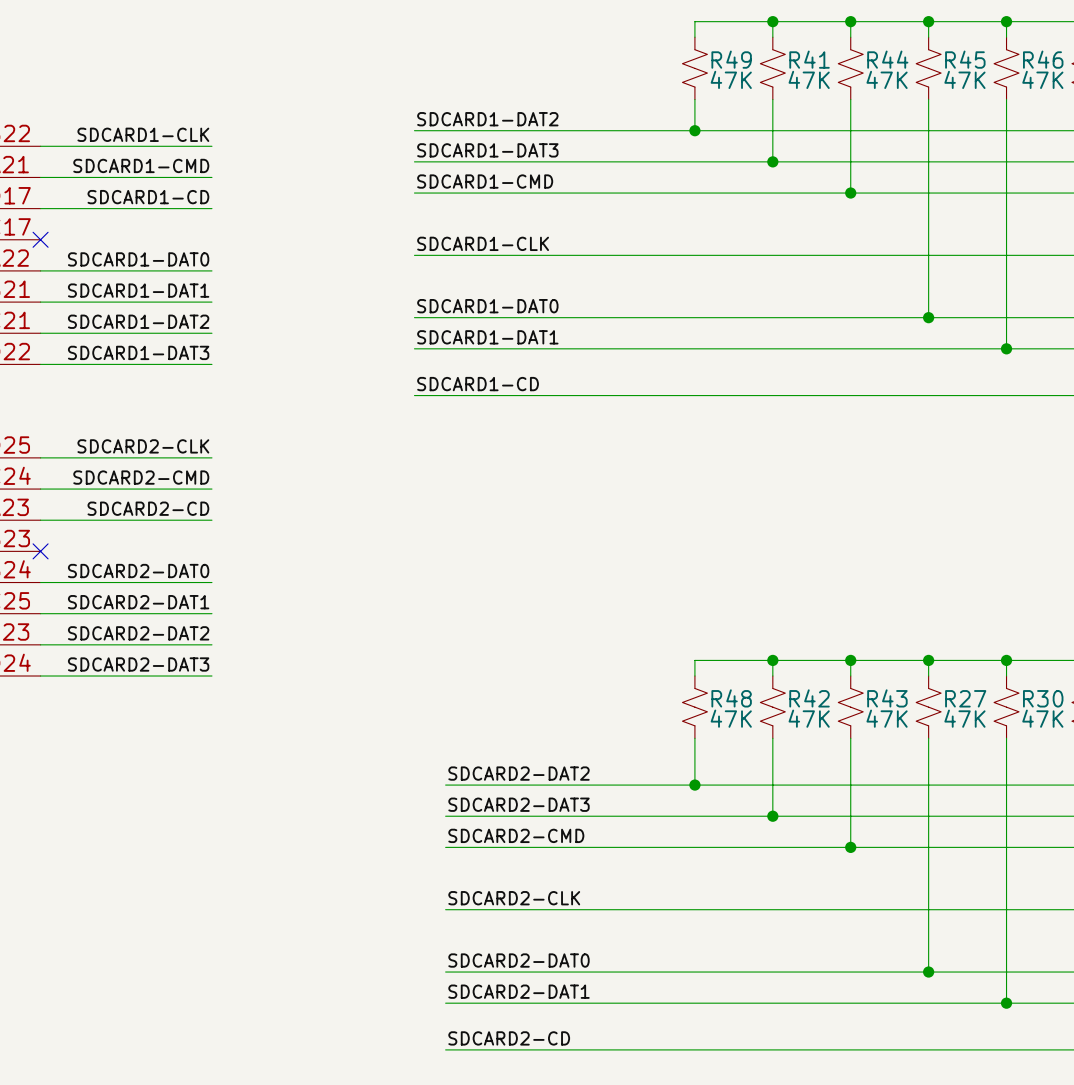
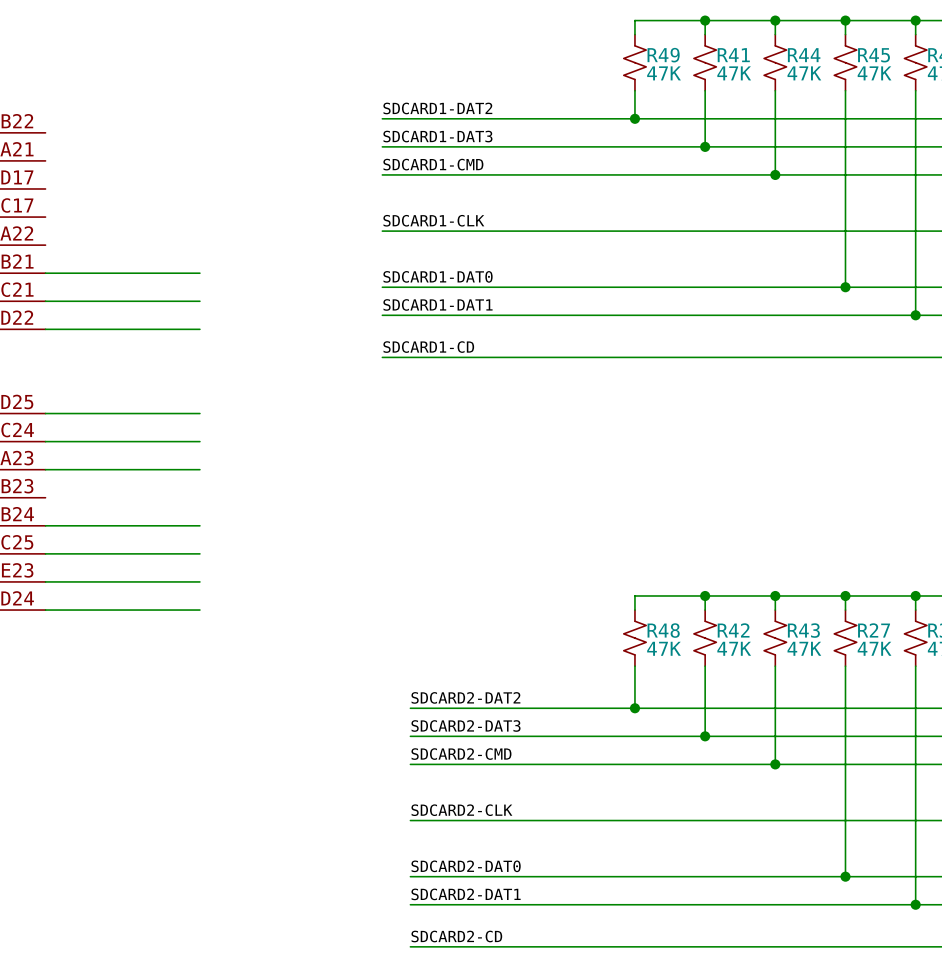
label: SDCARD1-CLK (143, 134) -> none
wire: (40, 146) (211, 146) -> none
label: SDCARD1-CMD (141, 165) -> none
wire: (40, 177) (211, 177) -> none
label: SDCARD1-CD (148, 197) -> none
wire: (40, 208) (211, 208) -> none
no-connect mark: (40, 239) -> none
label: SDCARD1-DAT0 (138, 259) -> none
wire: (40, 270) (211, 270) -> none
label: SDCARD1-DAT1 (138, 290) -> none
label: SDCARD1-DAT2 (138, 321) -> none
label: SDCARD1-DAT3 (138, 352) -> none
label: SDCARD2-CLK (143, 446) -> none
label: SDCARD2-CMD (141, 477) -> none
label: SDCARD2-CD (148, 508) -> none
no-connect mark: (40, 551) -> none
label: SDCARD2-DAT0 (138, 571) -> none
label: SDCARD2-DAT1 (138, 602) -> none
label: SDCARD2-DAT2 (138, 633) -> none
label: SDCARD2-DAT3 (138, 664) -> none

